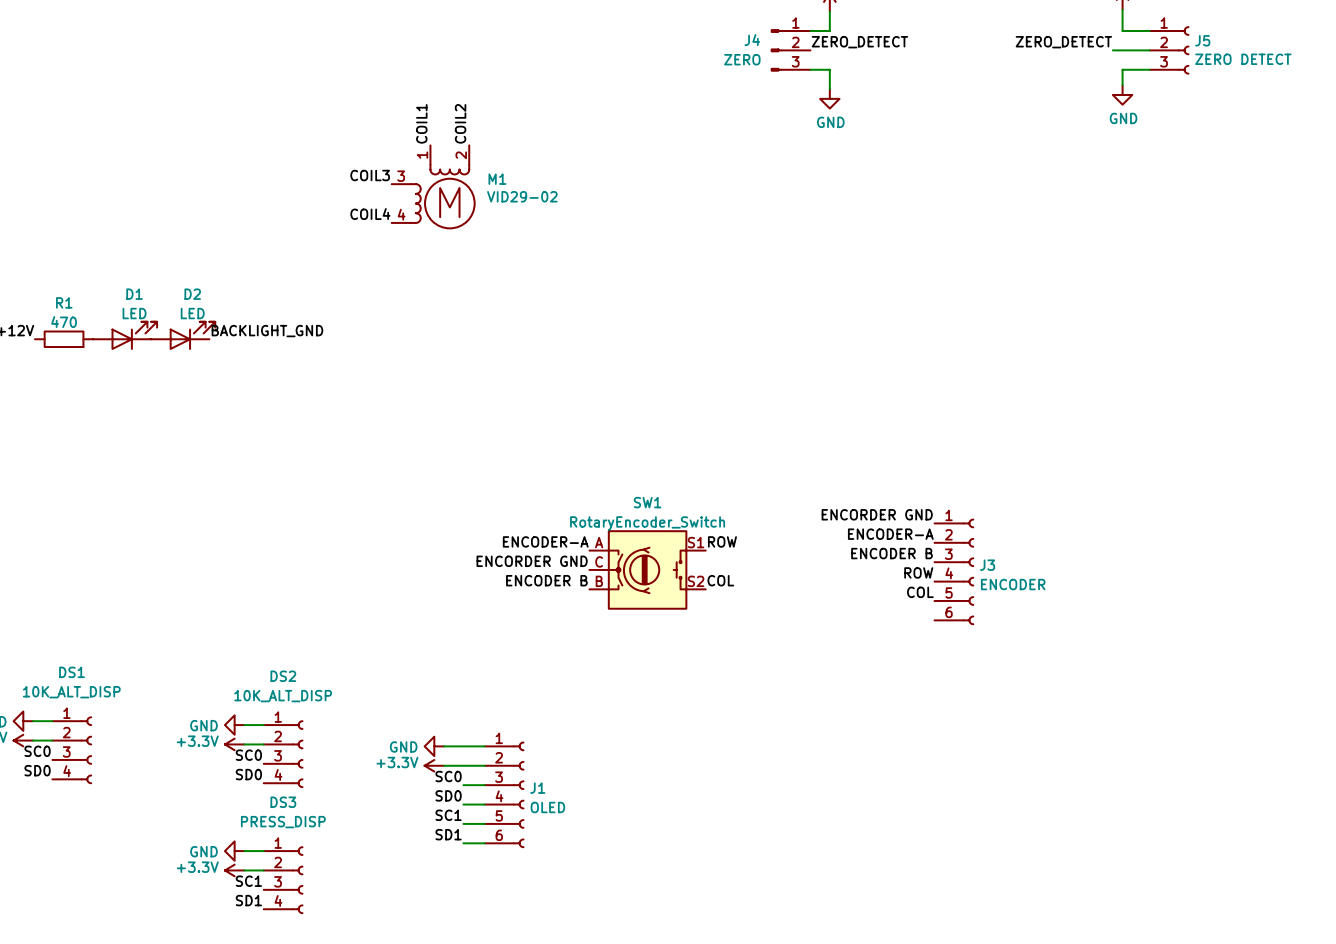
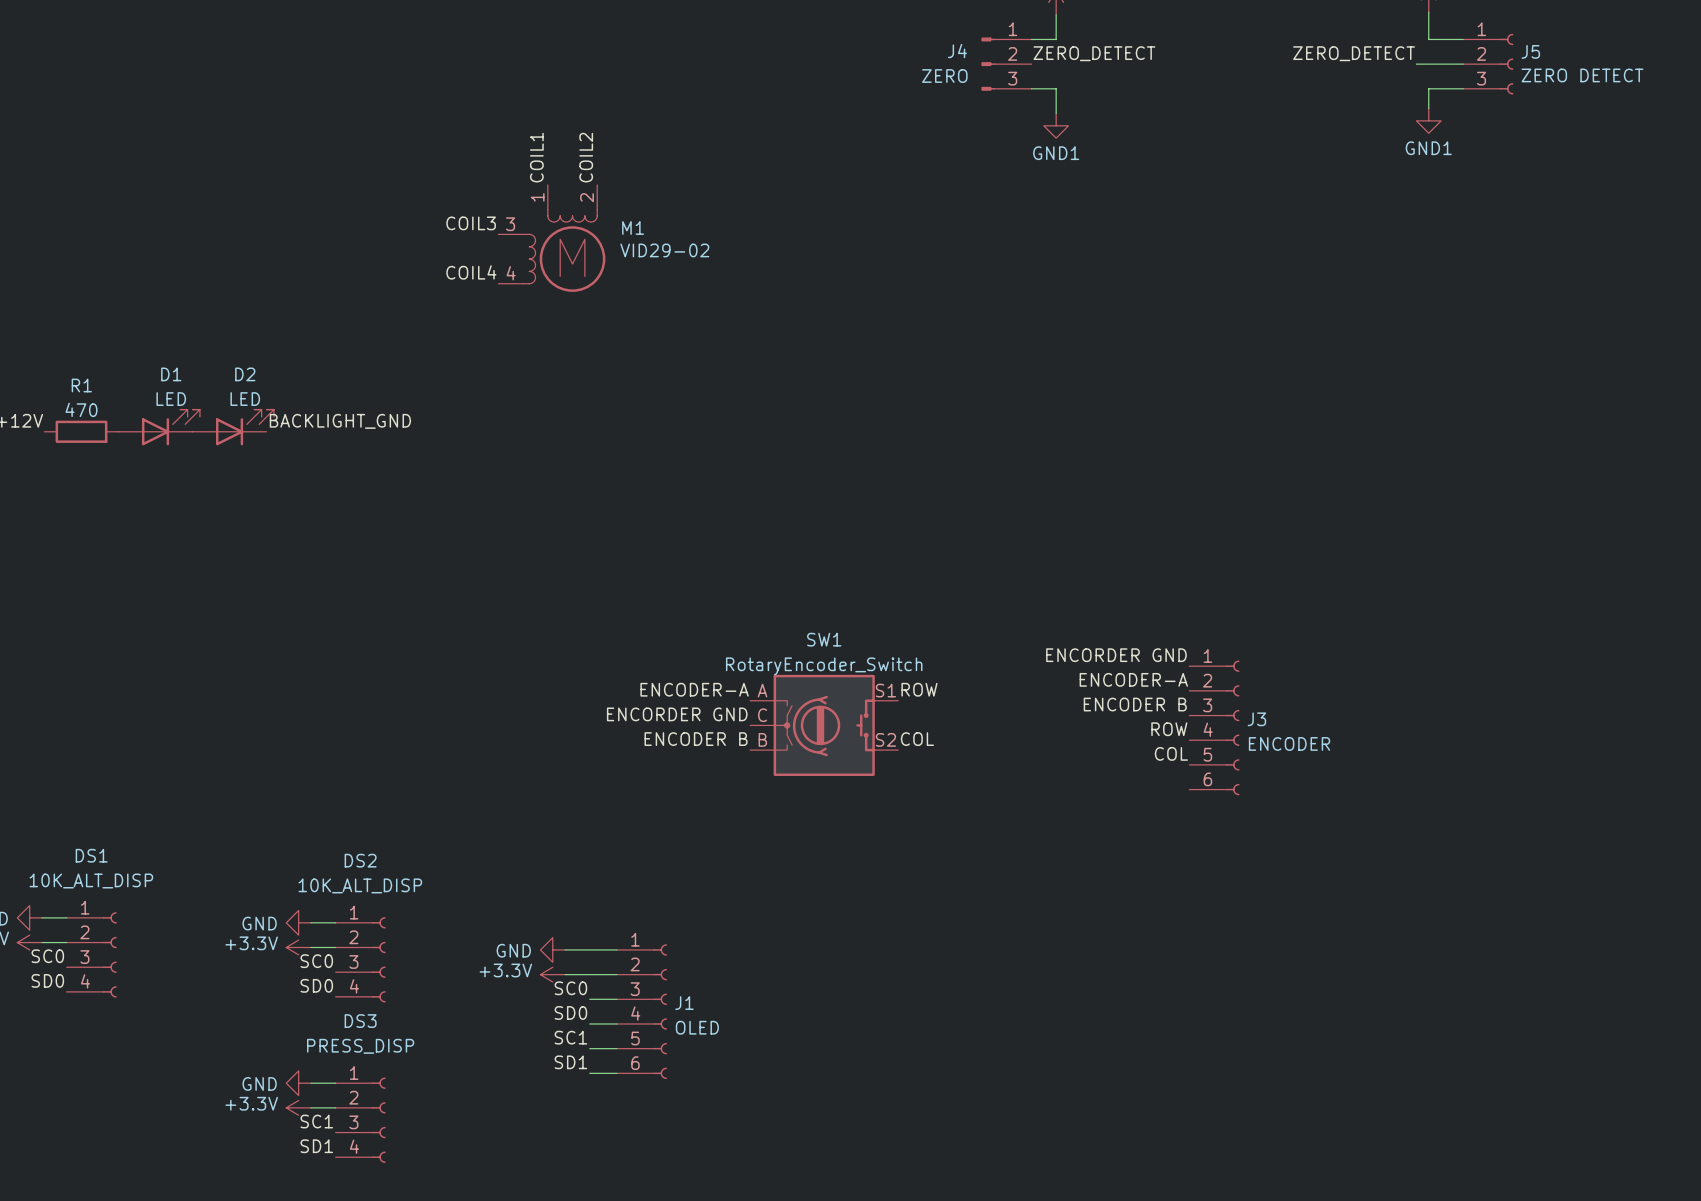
power symbol: GND (1122, 94) -> GND1 (1428, 120)
power symbol: GND (829, 98) -> GND1 (1056, 125)

